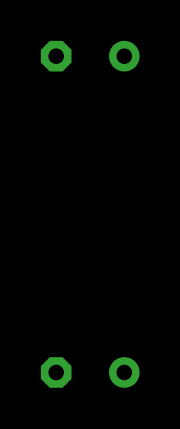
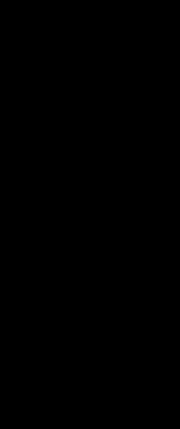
part: (90, 56) -> none
part: (90, 372) -> none

